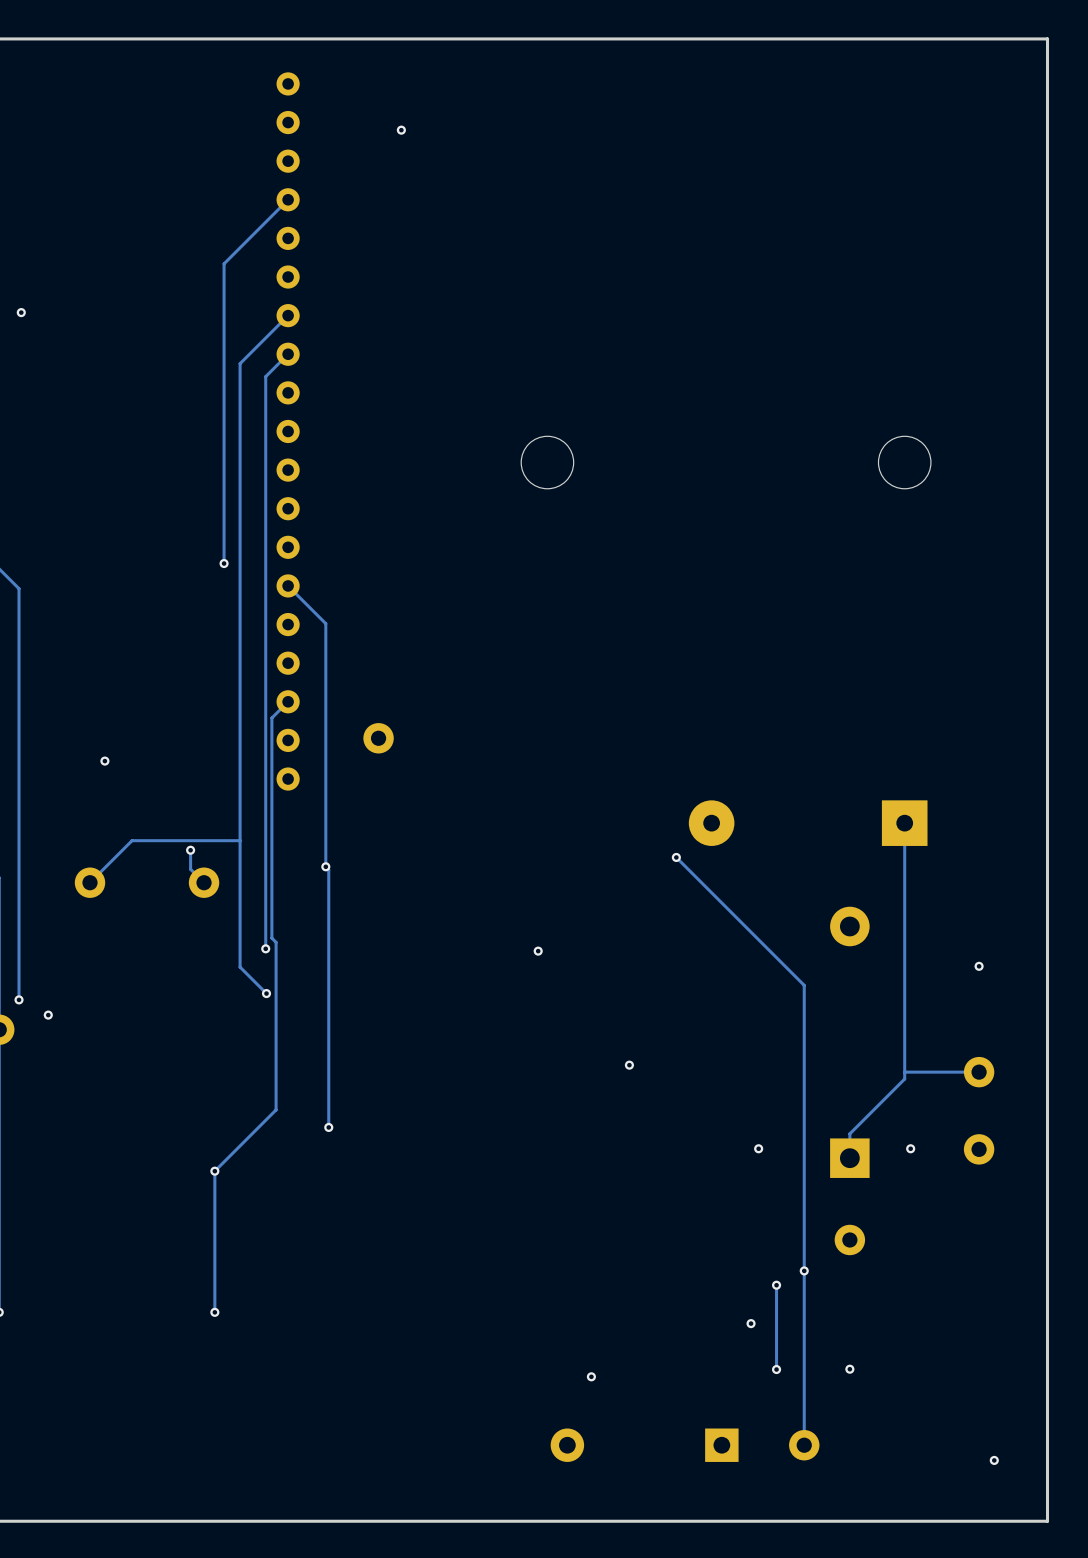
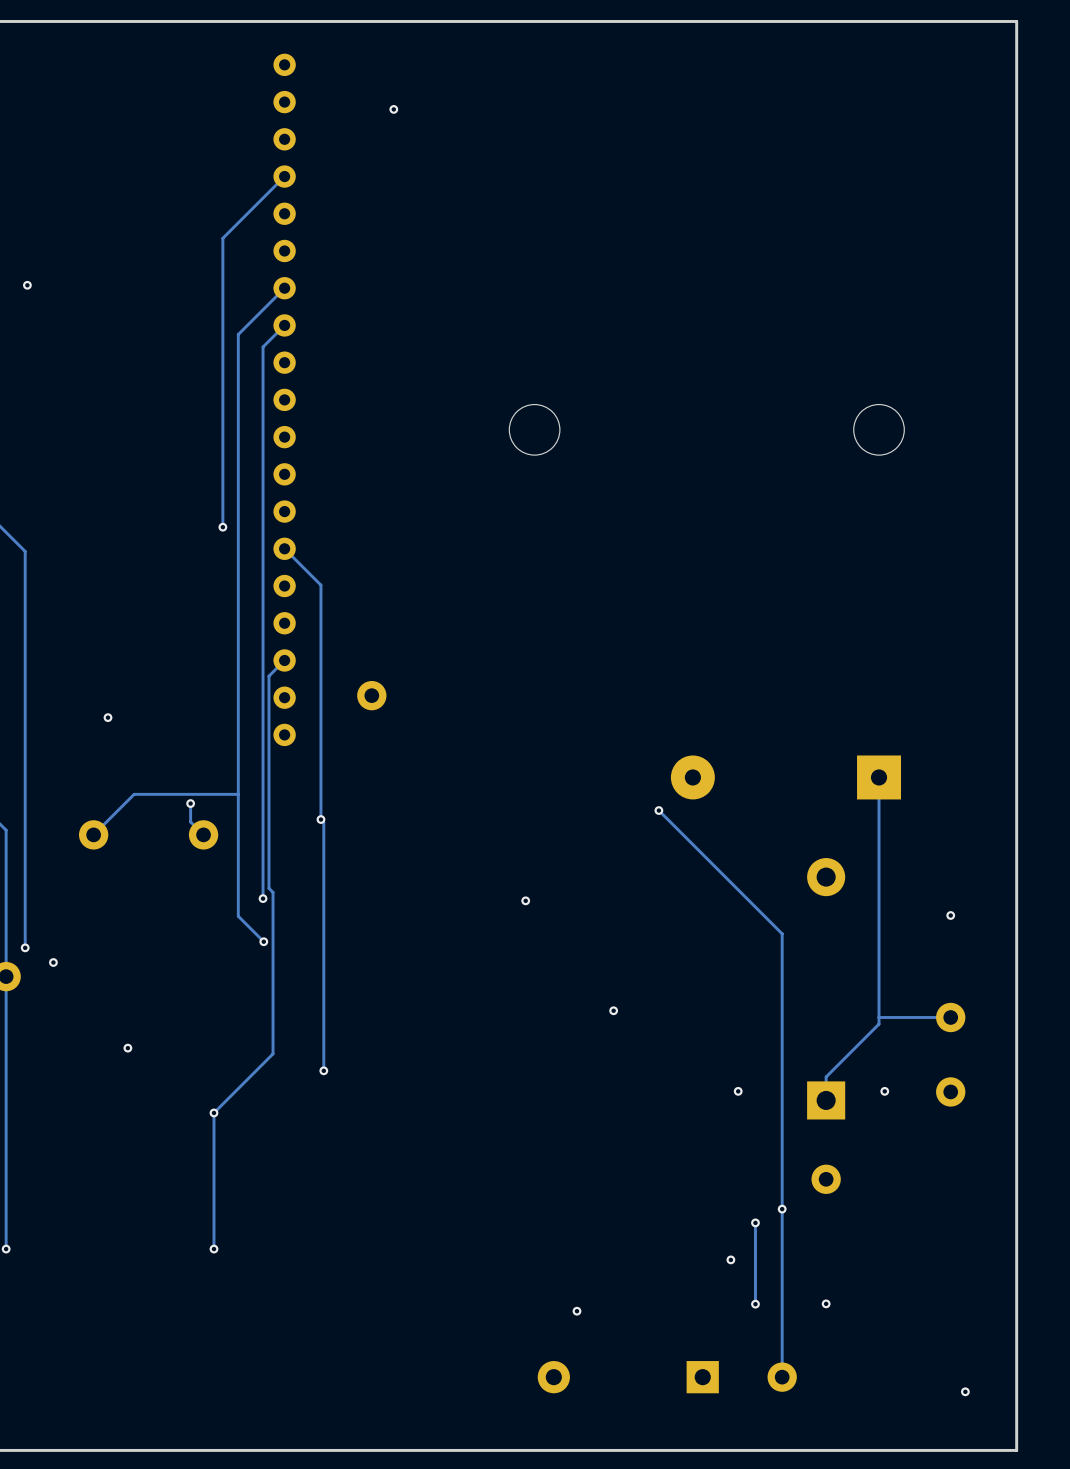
via: none -> (127, 1048)

